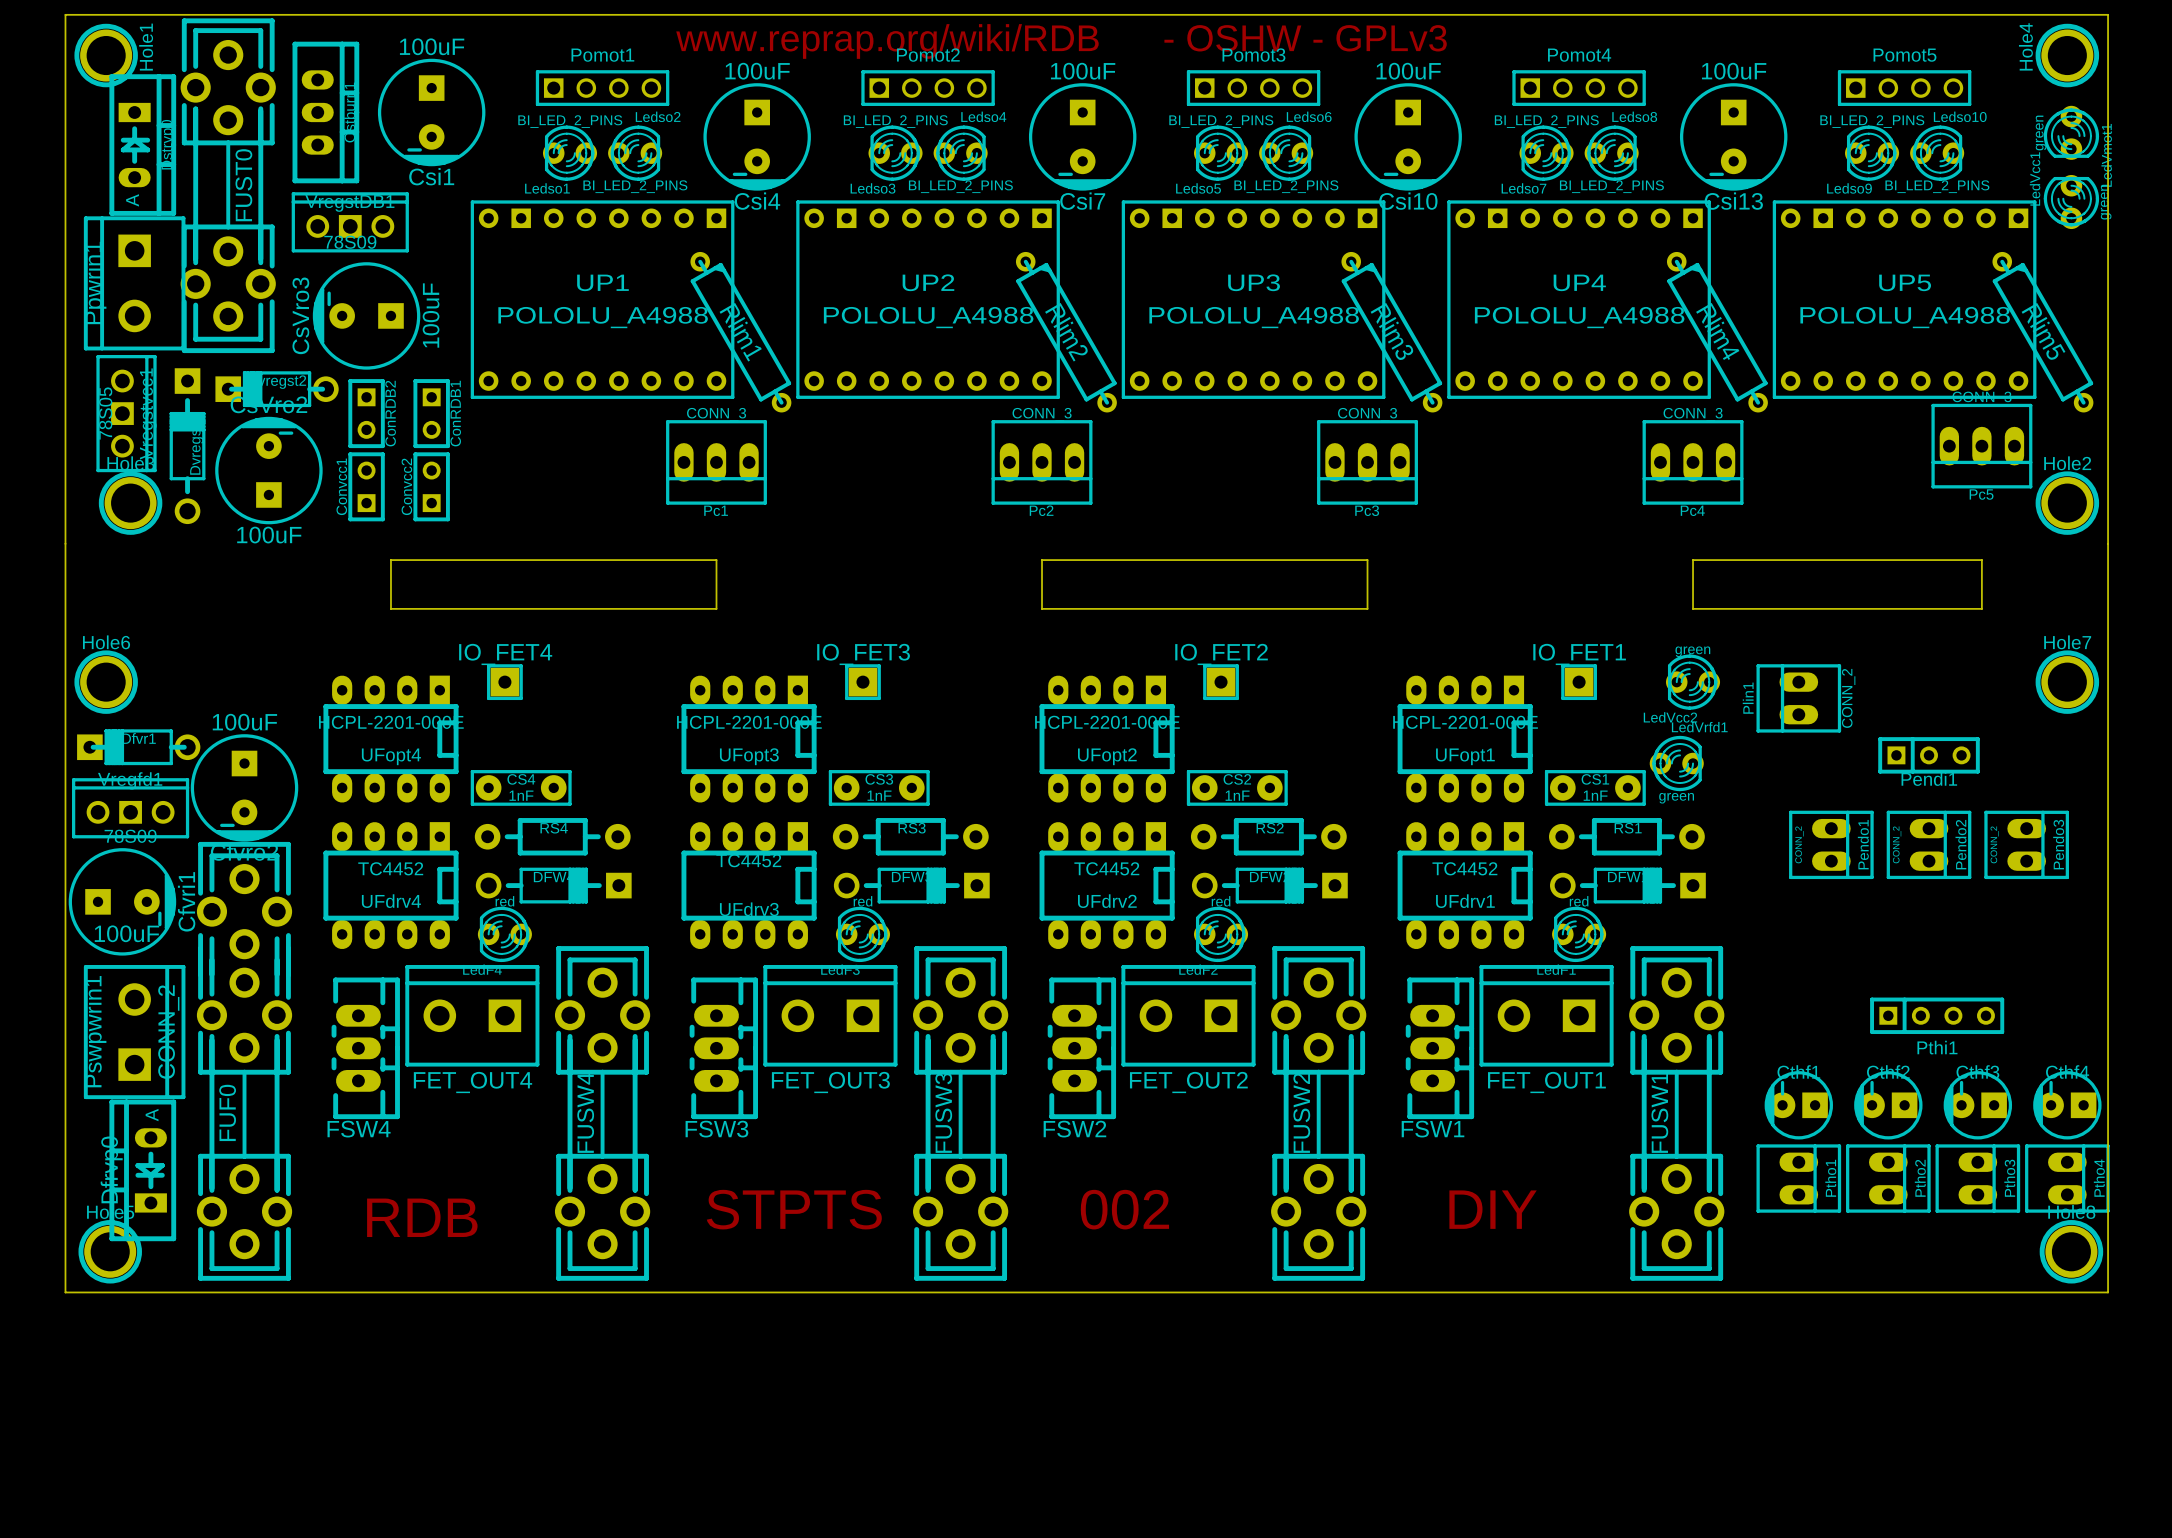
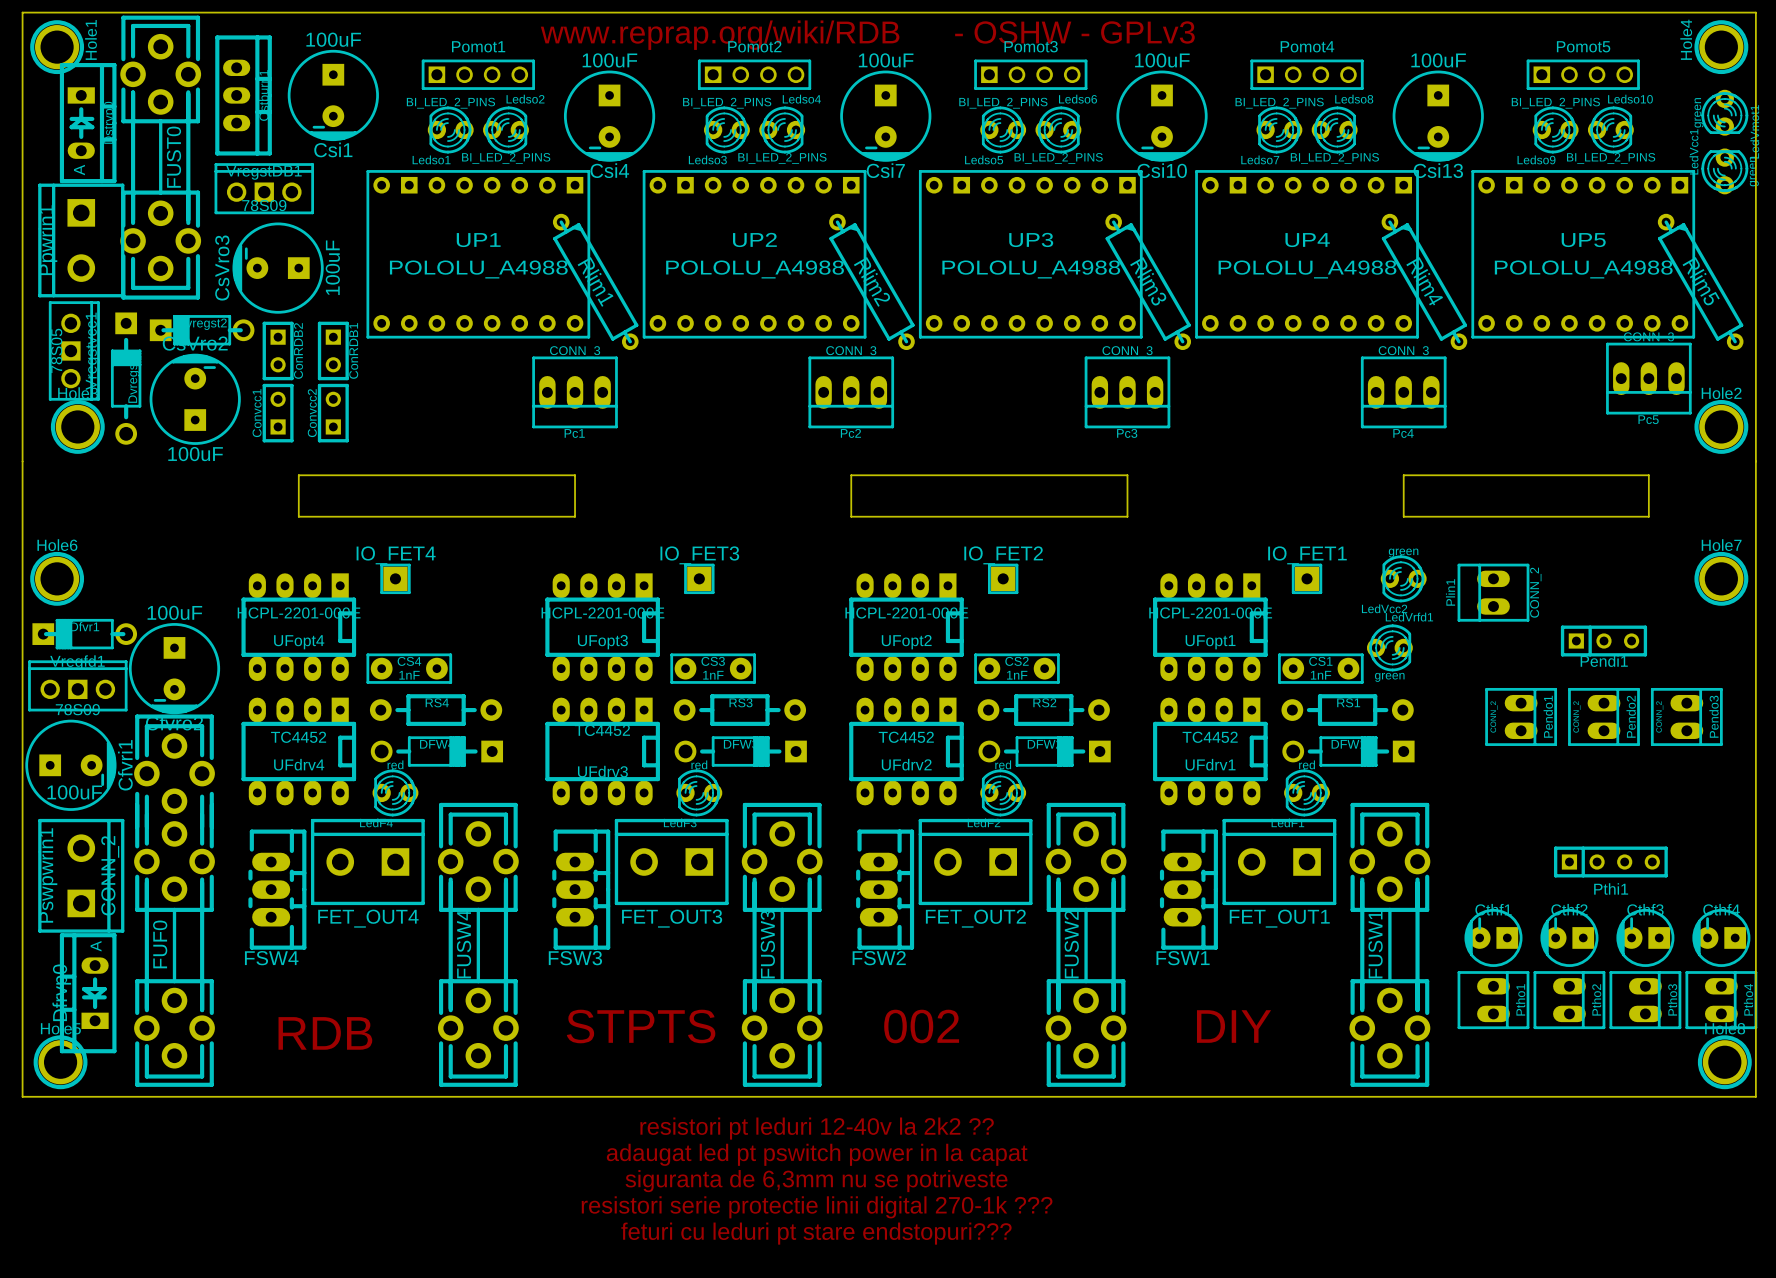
text: none -> resistori pt leduri 12-40v la 2k2 ?? (817, 1128)
text: none -> adaugat led pt pswitch power in la capat (817, 1154)
text: none -> siguranta de 6,3mm nu se potriveste (816, 1181)
text: none -> resistori serie protectie linii digital 270-1k ??? (817, 1207)
text: none -> feturi cu leduri pt stare endstopuri??? (816, 1233)

